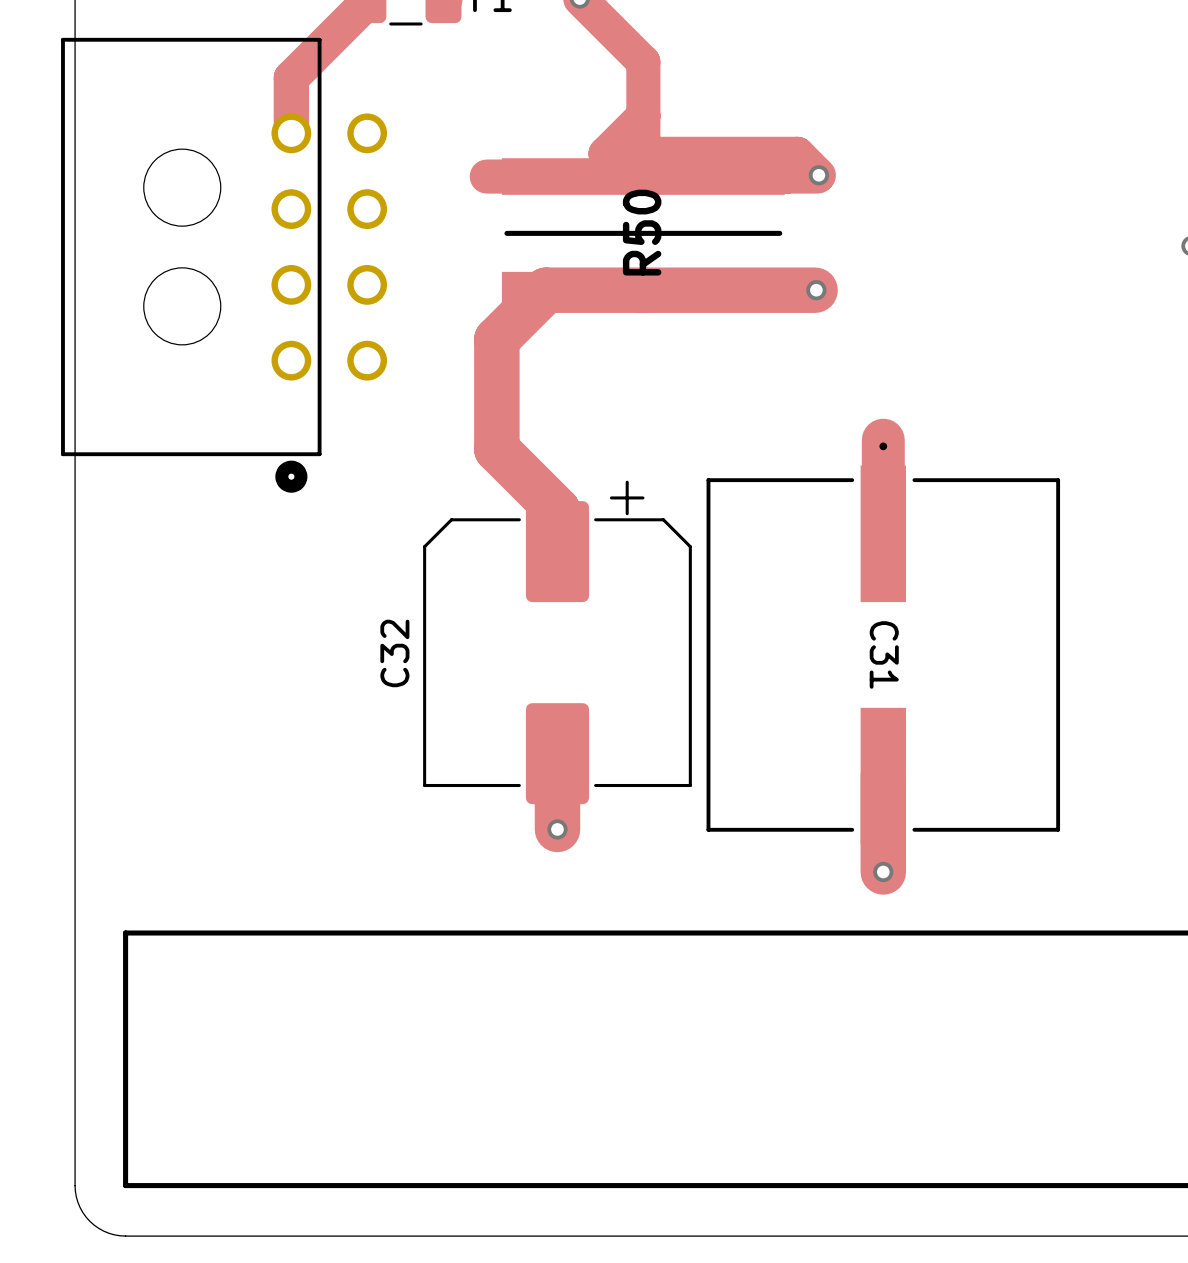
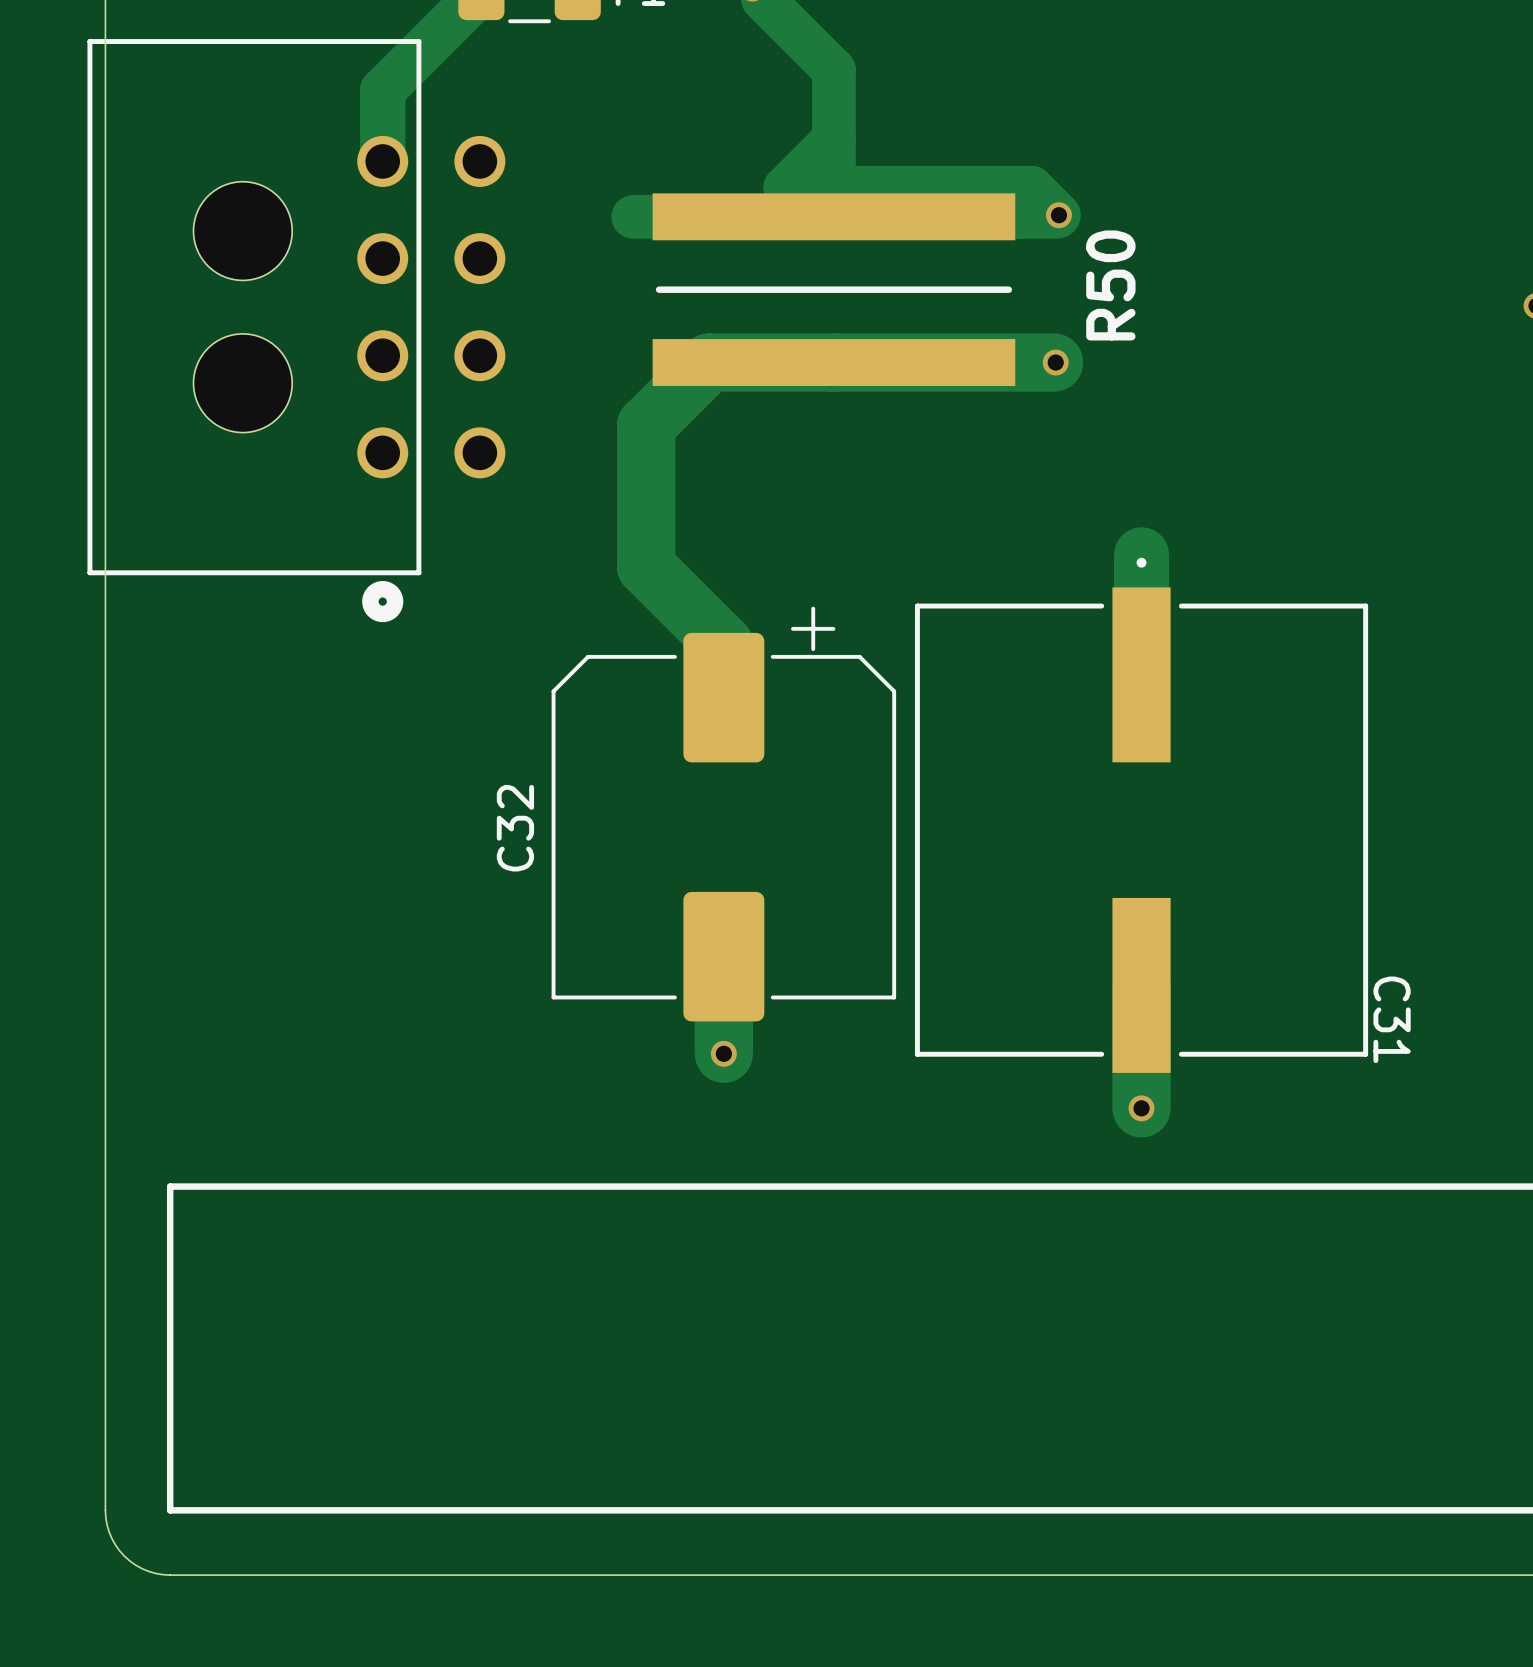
R50 name position: R50 (642, 232) -> R50 (1110, 285)
C31 name position: C31 (884, 654) -> C31 (1392, 1019)

